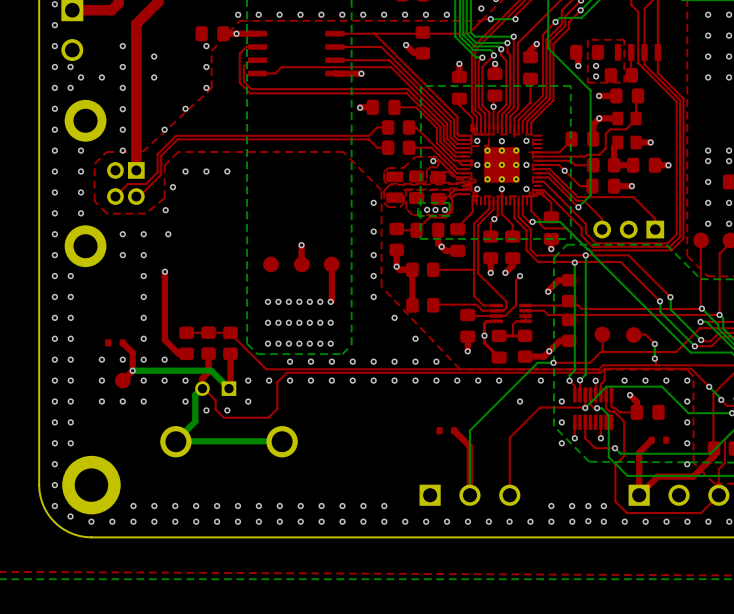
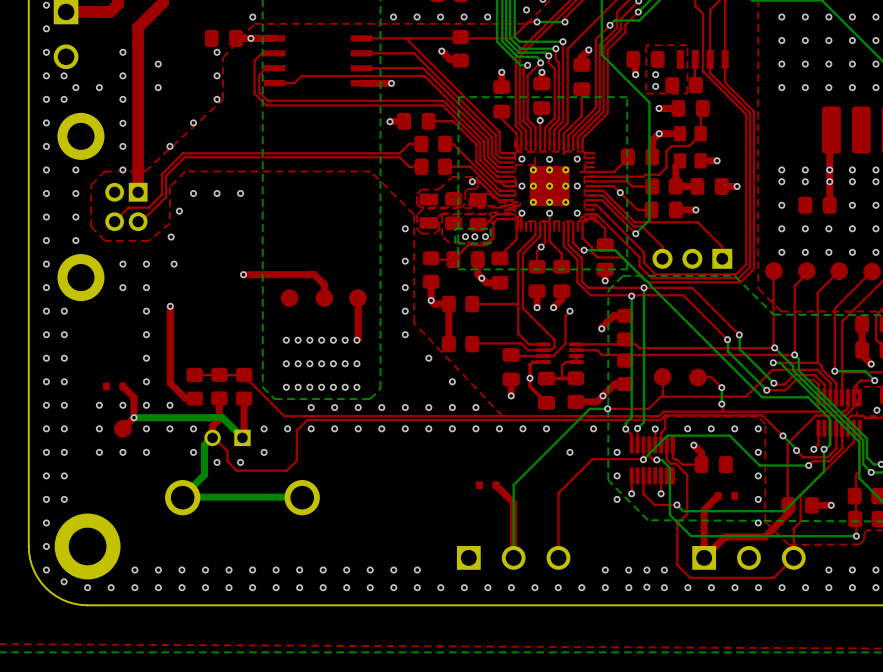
via: (258, 14) -> none
via: (279, 14) -> none
via: (300, 14) -> none
via: (321, 14) -> none
via: (342, 14) -> none
via: none -> (243, 274)
top track: (301, 245) (301, 264) -> (243, 274) (314, 274) (324, 284) (324, 298)
via: (301, 245) -> none

